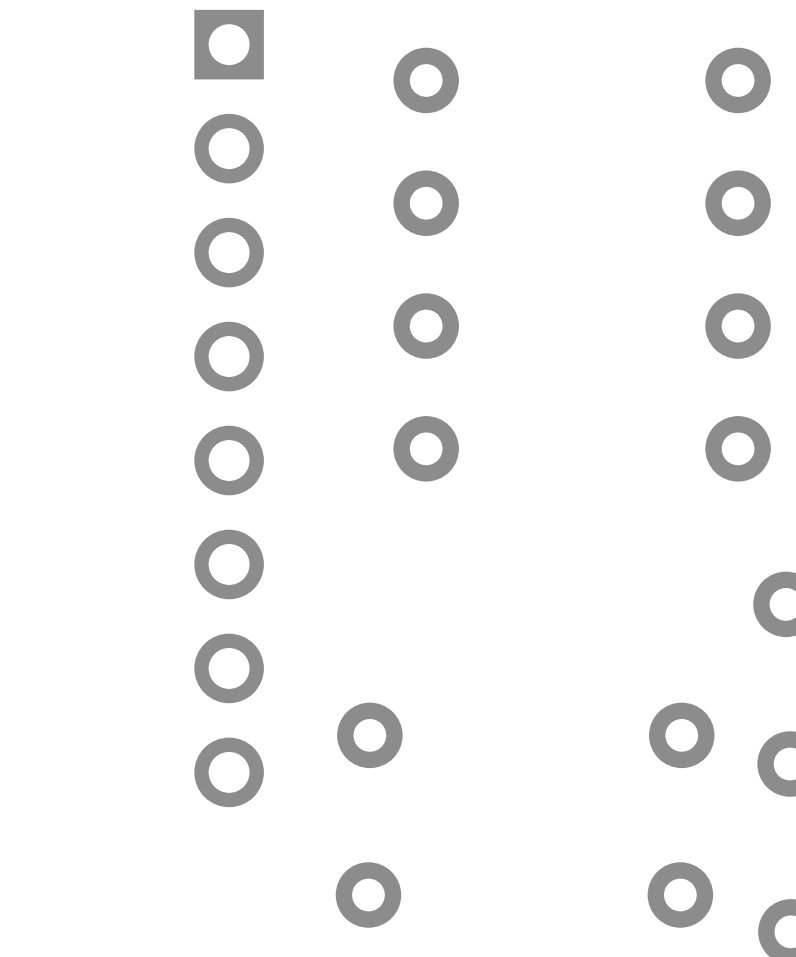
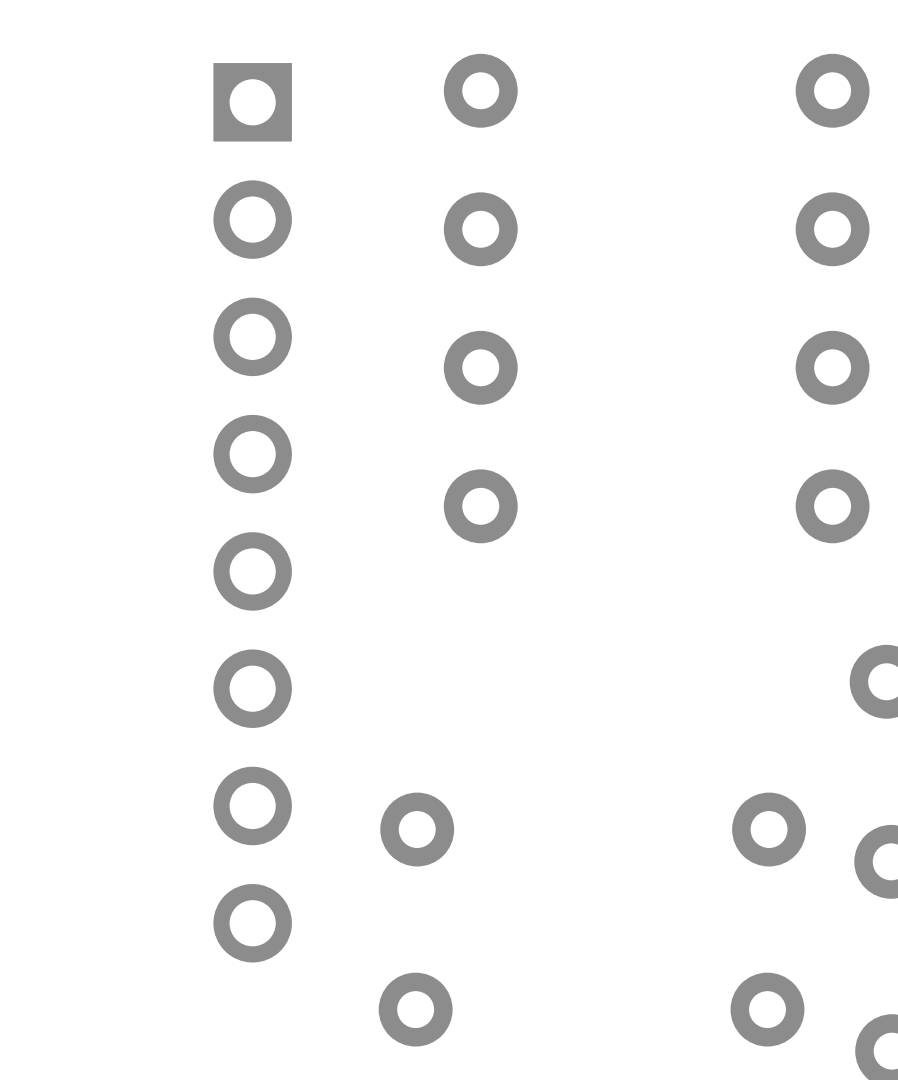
part position: (229, 408) -> (252, 512)

